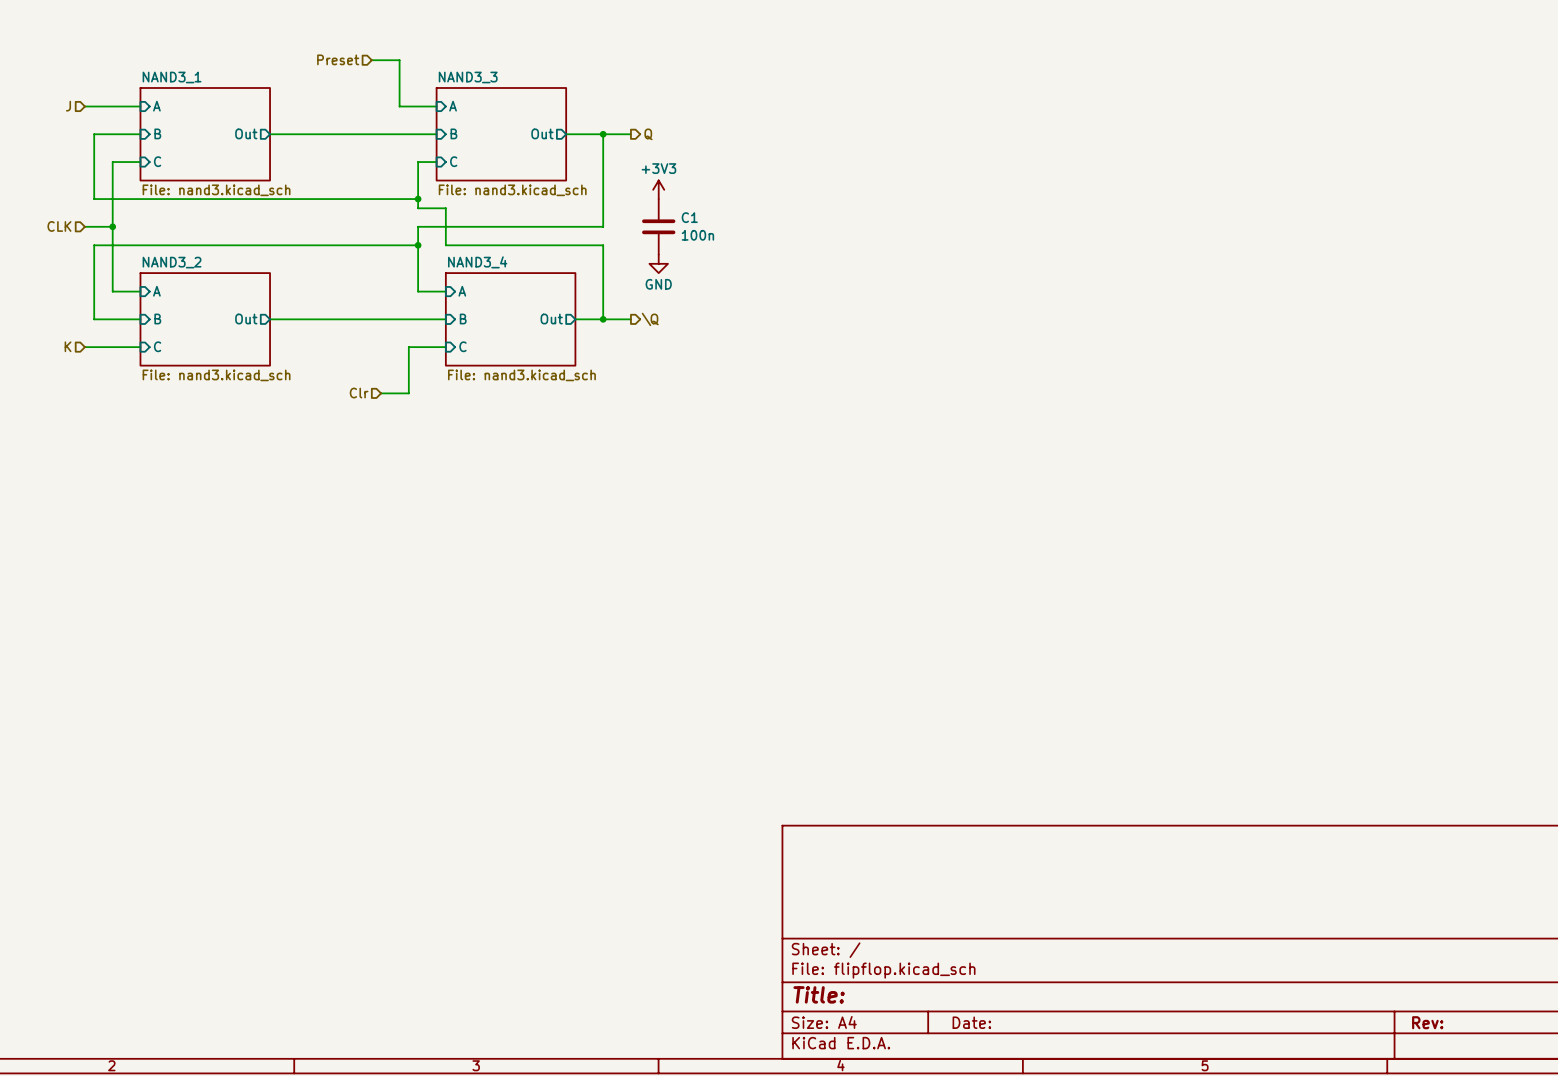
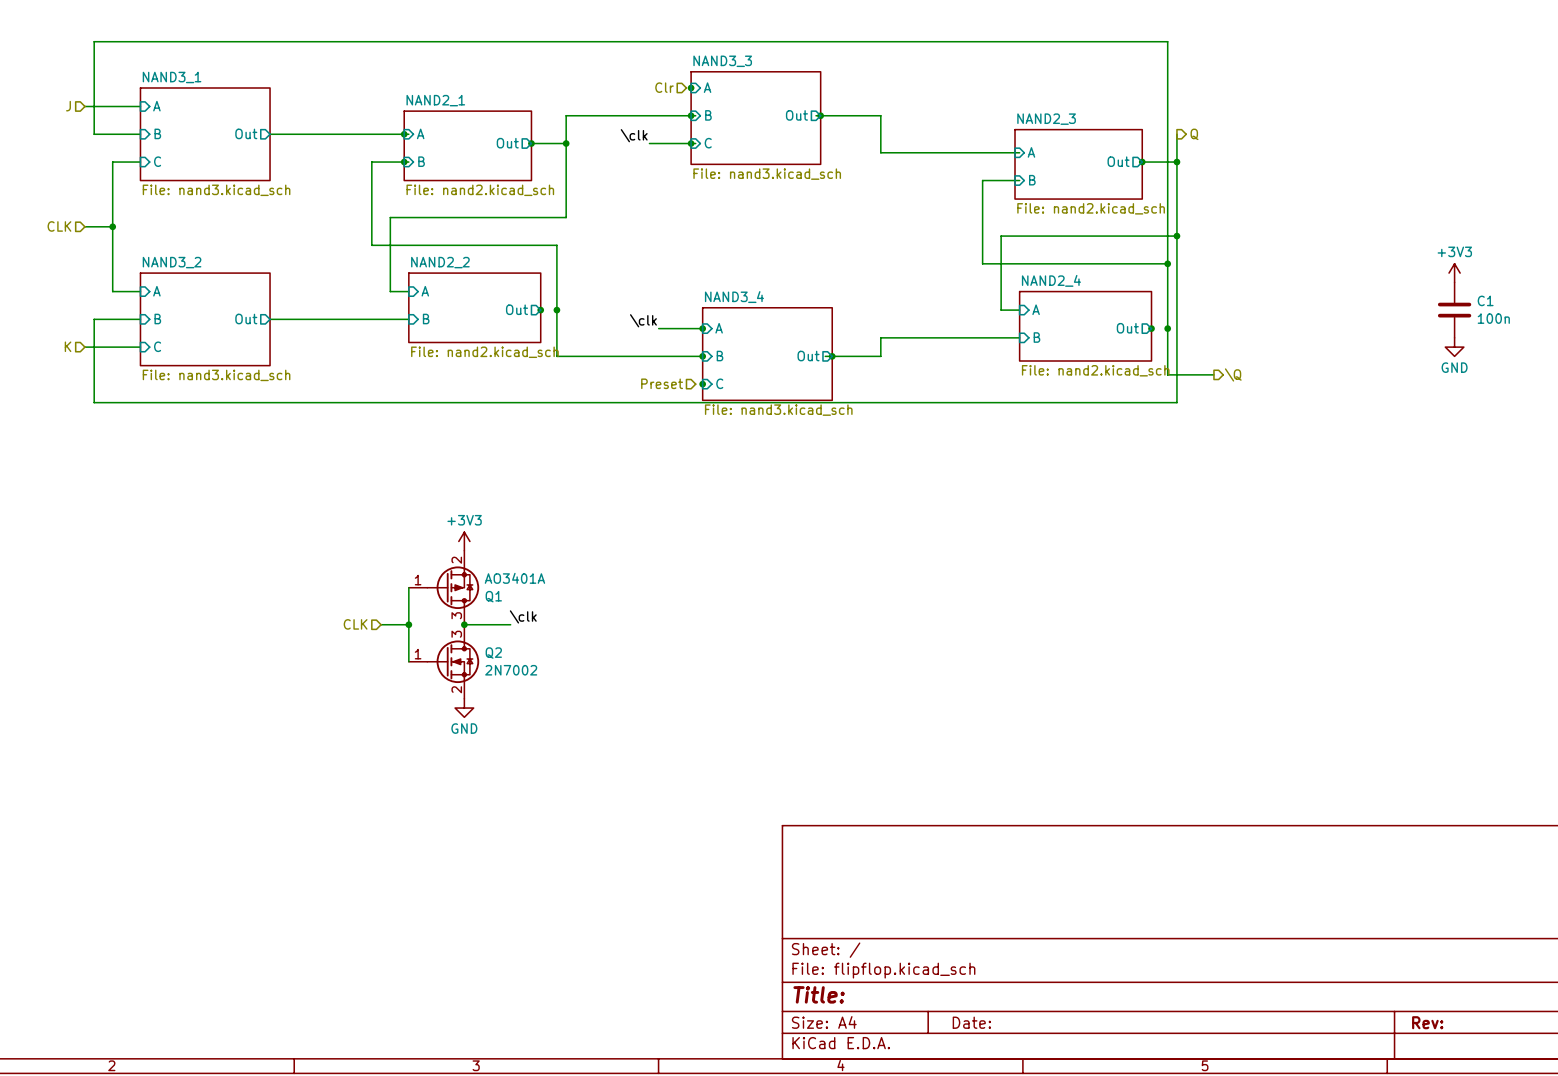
hierarchical label: Preset (338, 59) -> none
wire: (371, 60) (399, 60) (399, 106) (436, 106) -> none
hierarchical label: none -> Clr (664, 87)
junction: none -> (691, 87)
sheet pin: none -> A (707, 87)
sheet pin position: A (453, 106) -> A (420, 133)
junction: none -> (691, 115)
wire: none -> (695, 115) (566, 115) (566, 217) (390, 217) (390, 291) (408, 291)
sheet pin: none -> B (708, 115)
sheet pin: none -> Out (796, 115)
wire: none -> (816, 115) (880, 115) (880, 152) (1019, 152)
junction: none -> (820, 115)
sheet pin position: B (453, 133) -> B (421, 161)
sheet pin position: Out (542, 133) -> Out (507, 143)
wire: (94, 134) (94, 199) (418, 199) -> (94, 134) (94, 41) (1167, 41) (1167, 374) (1213, 374)
junction: none -> (404, 134)
wire: (408, 134) (436, 134) -> none
sheet NAND3_3 position: (501, 134) -> (755, 118)
wire: (566, 134) (630, 134) -> none
wire: (603, 134) (603, 226) (418, 226) (418, 291) (445, 291) -> none
junction: (603, 134) -> none
hierarchical label: Q (648, 134) -> none
wire: none -> (1176, 134) (1176, 402) (94, 402) (94, 319)
hierarchical label: none -> Q (1194, 134)
label: none -> \clk (634, 135)
wire: none -> (529, 143) (566, 143)
junction: none -> (531, 143)
junction: none -> (566, 143)
wire: none -> (649, 143) (695, 143)
junction: none -> (691, 143)
sheet pin: none -> C (708, 143)
sheet NAND2_1: none -> File: nand2.kicad_sch (467, 145)
sheet pin: none -> A (1031, 152)
sheet pin: C (453, 161) -> none
sheet pin: none -> Out (1118, 161)
junction: none -> (404, 162)
wire: (436, 162) (418, 162) (418, 208) (445, 208) (445, 245) -> (418, 245) (445, 245)
wire: none -> (1139, 162) (1176, 162)
junction: none -> (1142, 162)
junction: none -> (1176, 162)
sheet NAND2_3: none -> File: nand2.kicad_sch (1078, 164)
wire: none -> (1019, 180) (982, 180) (982, 263) (1167, 263)
sheet pin: none -> B (1032, 180)
power symbol: +3V3 (658, 189) -> none
junction: (418, 199) -> none
C1 position: (658, 226) -> (1454, 310)
wire: none -> (1176, 236) (1001, 236) (1001, 310) (1019, 310)
junction: none -> (1176, 236)
wire: (371, 245) (94, 245) (94, 319) -> (371, 245) (371, 162) (408, 162)
junction: (418, 245) -> none
wire: (556, 245) (603, 245) (603, 319) -> (556, 245) (556, 356) (704, 356)
power symbol: GND (658, 263) -> none
junction: none -> (1167, 263)
power symbol: none -> +3V3 (1454, 273)
sheet pin position: A (462, 291) -> A (425, 291)
sheet NAND2_2: none -> File: nand2.kicad_sch (474, 307)
sheet pin: none -> A (1036, 309)
junction: none -> (540, 310)
junction: none -> (556, 310)
wire: (408, 319) (445, 319) -> none
sheet pin position: B (463, 319) -> B (426, 319)
sheet NAND3_4 position: (510, 319) -> (767, 354)
sheet pin position: Out (551, 319) -> Out (516, 309)
wire: (575, 319) (630, 319) -> none
junction: (603, 319) -> none
hierarchical label: \Q (650, 319) -> none
label: none -> \clk (643, 320)
sheet NAND2_4: none -> File: nand2.kicad_sch (1085, 326)
wire: none -> (658, 328) (704, 328)
junction: none -> (702, 328)
sheet pin: none -> A (719, 328)
sheet pin: none -> Out (1127, 328)
junction: none -> (1151, 328)
junction: none -> (1167, 328)
wire: none -> (1019, 337) (880, 337) (880, 356) (825, 356)
sheet pin: none -> B (1036, 337)
sheet pin: C (462, 346) -> none
wire: (445, 347) (408, 347) (408, 393) (381, 393) -> none
power symbol: none -> GND (1454, 347)
junction: none -> (702, 356)
sheet pin: none -> B (720, 356)
sheet pin: none -> Out (808, 356)
junction: none -> (832, 356)
hierarchical label: none -> \Q (1233, 374)
hierarchical label: none -> Preset (662, 383)
sheet pin: none -> C (719, 383)
junction: none -> (702, 384)
hierarchical label: Clr (359, 393) -> none
power symbol: none -> +3V3 (464, 541)
wire: none -> (408, 587) (408, 661)
Q1: none -> AO3401A (444, 587)
label: none -> \clk (523, 616)
hierarchical label: none -> CLK (355, 624)
wire: none -> (381, 624) (408, 624)
junction: none -> (408, 624)
wire: none -> (464, 624) (510, 624)
junction: none -> (464, 624)
Q2: none -> 2N7002 (444, 661)
power symbol: none -> GND (464, 708)

